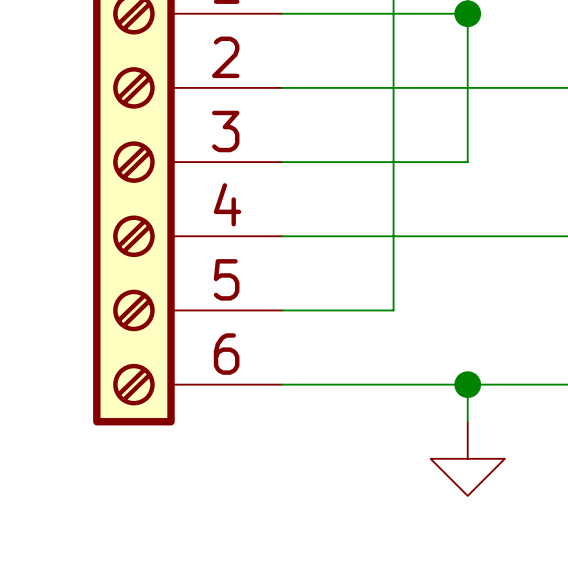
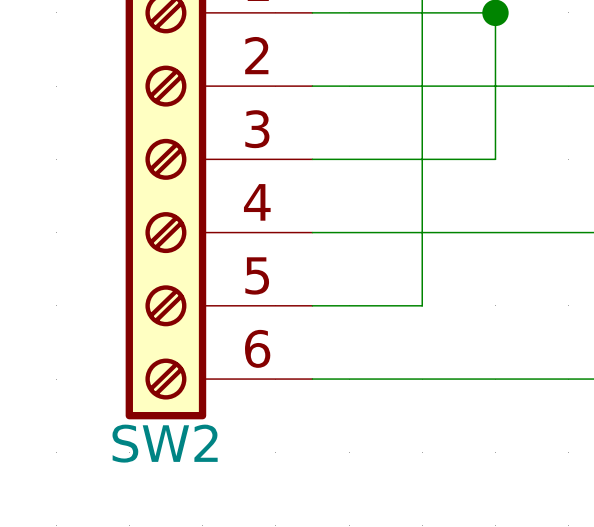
wire: (467, 384) (467, 421) -> none
junction: (467, 384) -> none
part value: none -> SW2 (165, 443)
power symbol: (467, 458) -> none

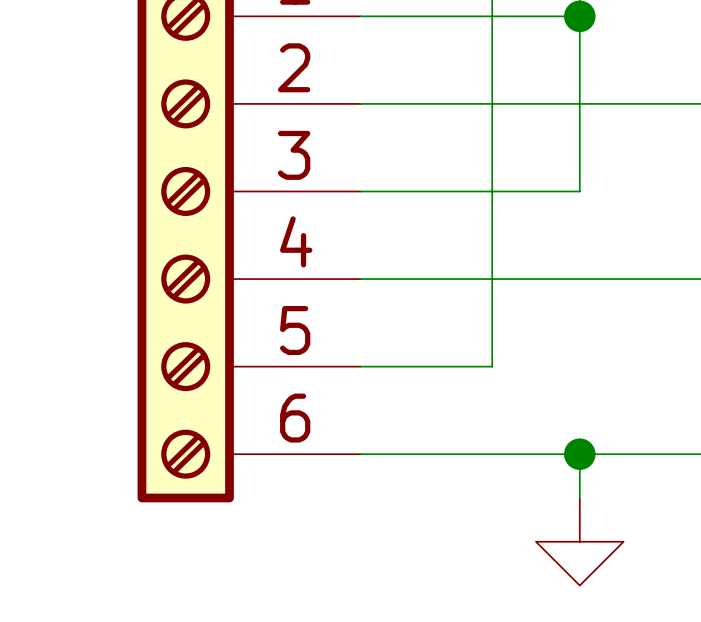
wire: none -> (579, 454) (579, 497)
junction: none -> (579, 454)
part value: SW2 (165, 443) -> none
power symbol: none -> (579, 541)

